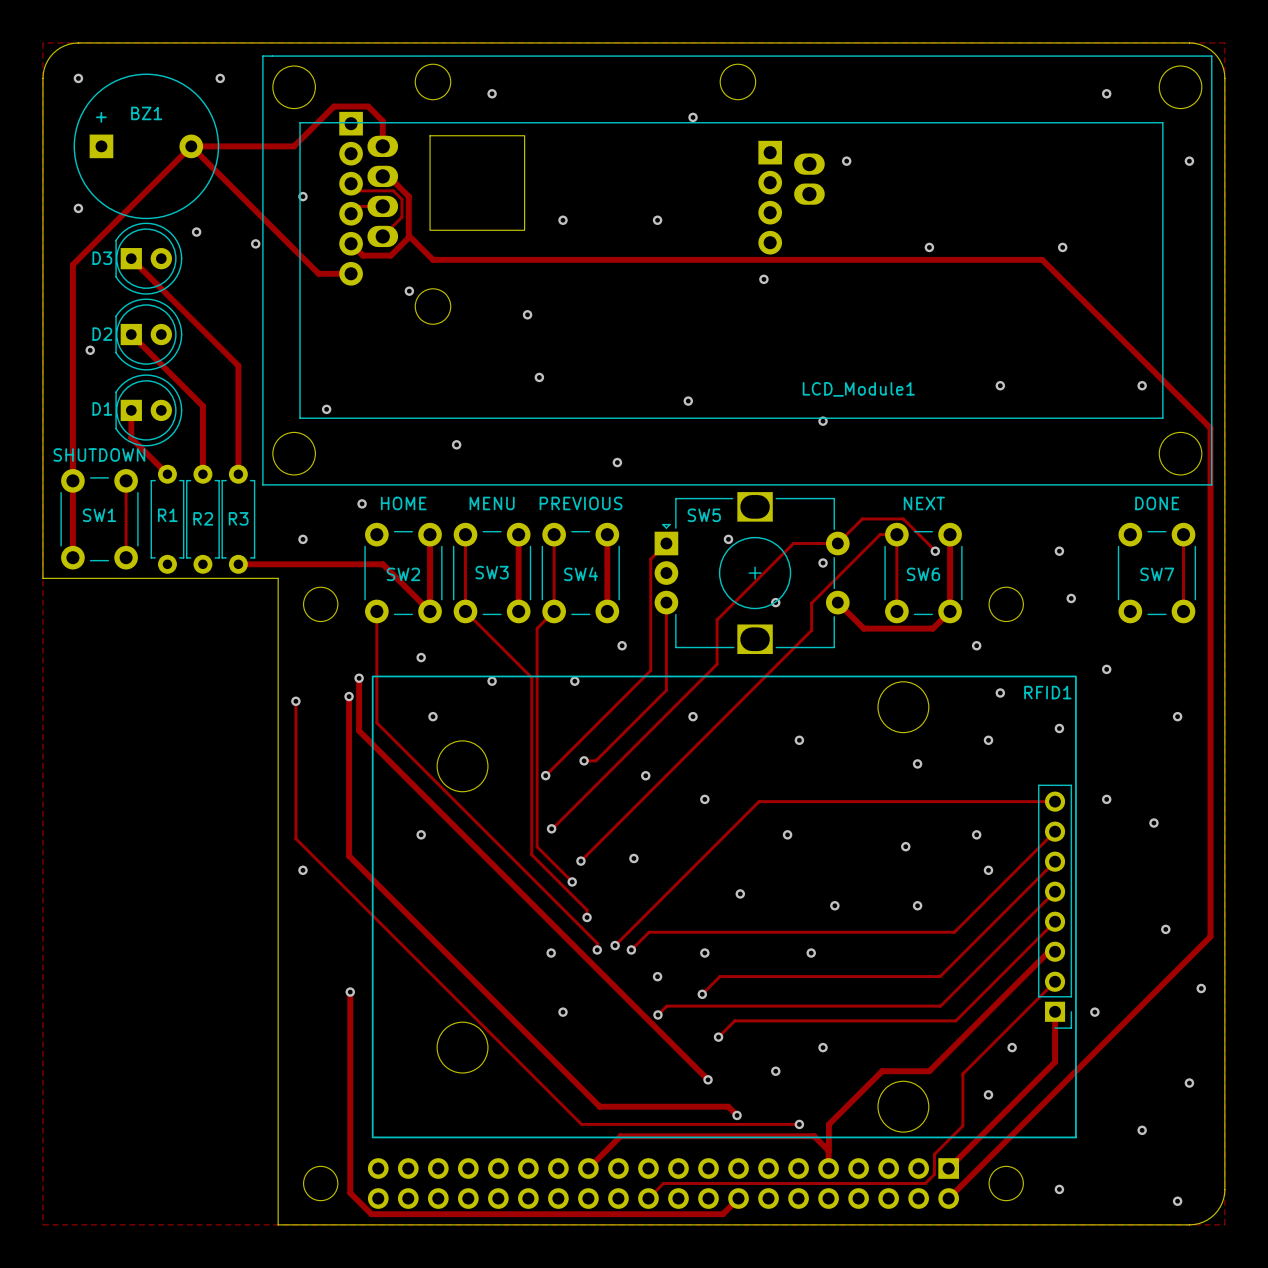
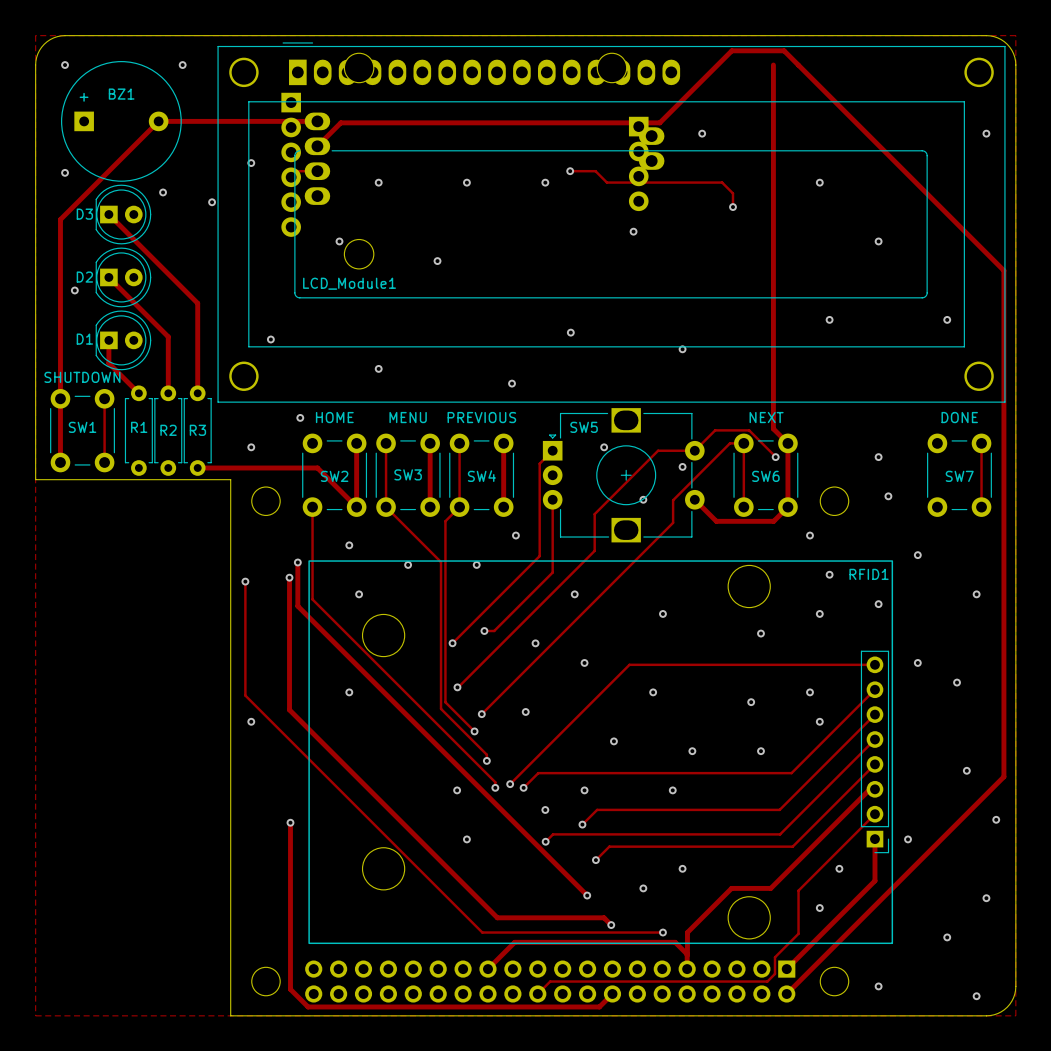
LCD_Module1 footprint: [262, 55, 1213, 486] -> [217, 42, 1006, 403]
track: none -> (773, 65) (773, 428) (787, 443)
via: (492, 93) -> none
via: (1106, 93) -> none
via: (693, 117) -> none
track: (191, 146) (318, 273) (351, 273) -> none
track: (294, 146) (333, 106) (368, 106) (382, 121) (382, 146) -> (243, 121) (317, 121)
track: (382, 176) (388, 176) (408, 196) (408, 237) (390, 255) (362, 255) (351, 243) -> none
track: (351, 183) (358, 190) (393, 190) (401, 199) (401, 217) (382, 236) -> none
track: none -> (570, 171) (595, 171) (606, 182) (722, 182) (732, 193) (732, 207)
via: none -> (570, 171)
via: none -> (378, 182)
via: none -> (819, 182)
track: (408, 235) (433, 259) (1042, 259) (1210, 428) -> (317, 146) (340, 122) (659, 122) (731, 50) (784, 50) (1003, 270) (1003, 354)
via: (929, 247) -> none
via: (1062, 247) -> none
via: none -> (732, 207)
via: none -> (878, 241)
via: (539, 377) -> none
LCD_Module1 name position: LCD_Module1 (858, 389) -> LCD_Module1 (349, 283)

